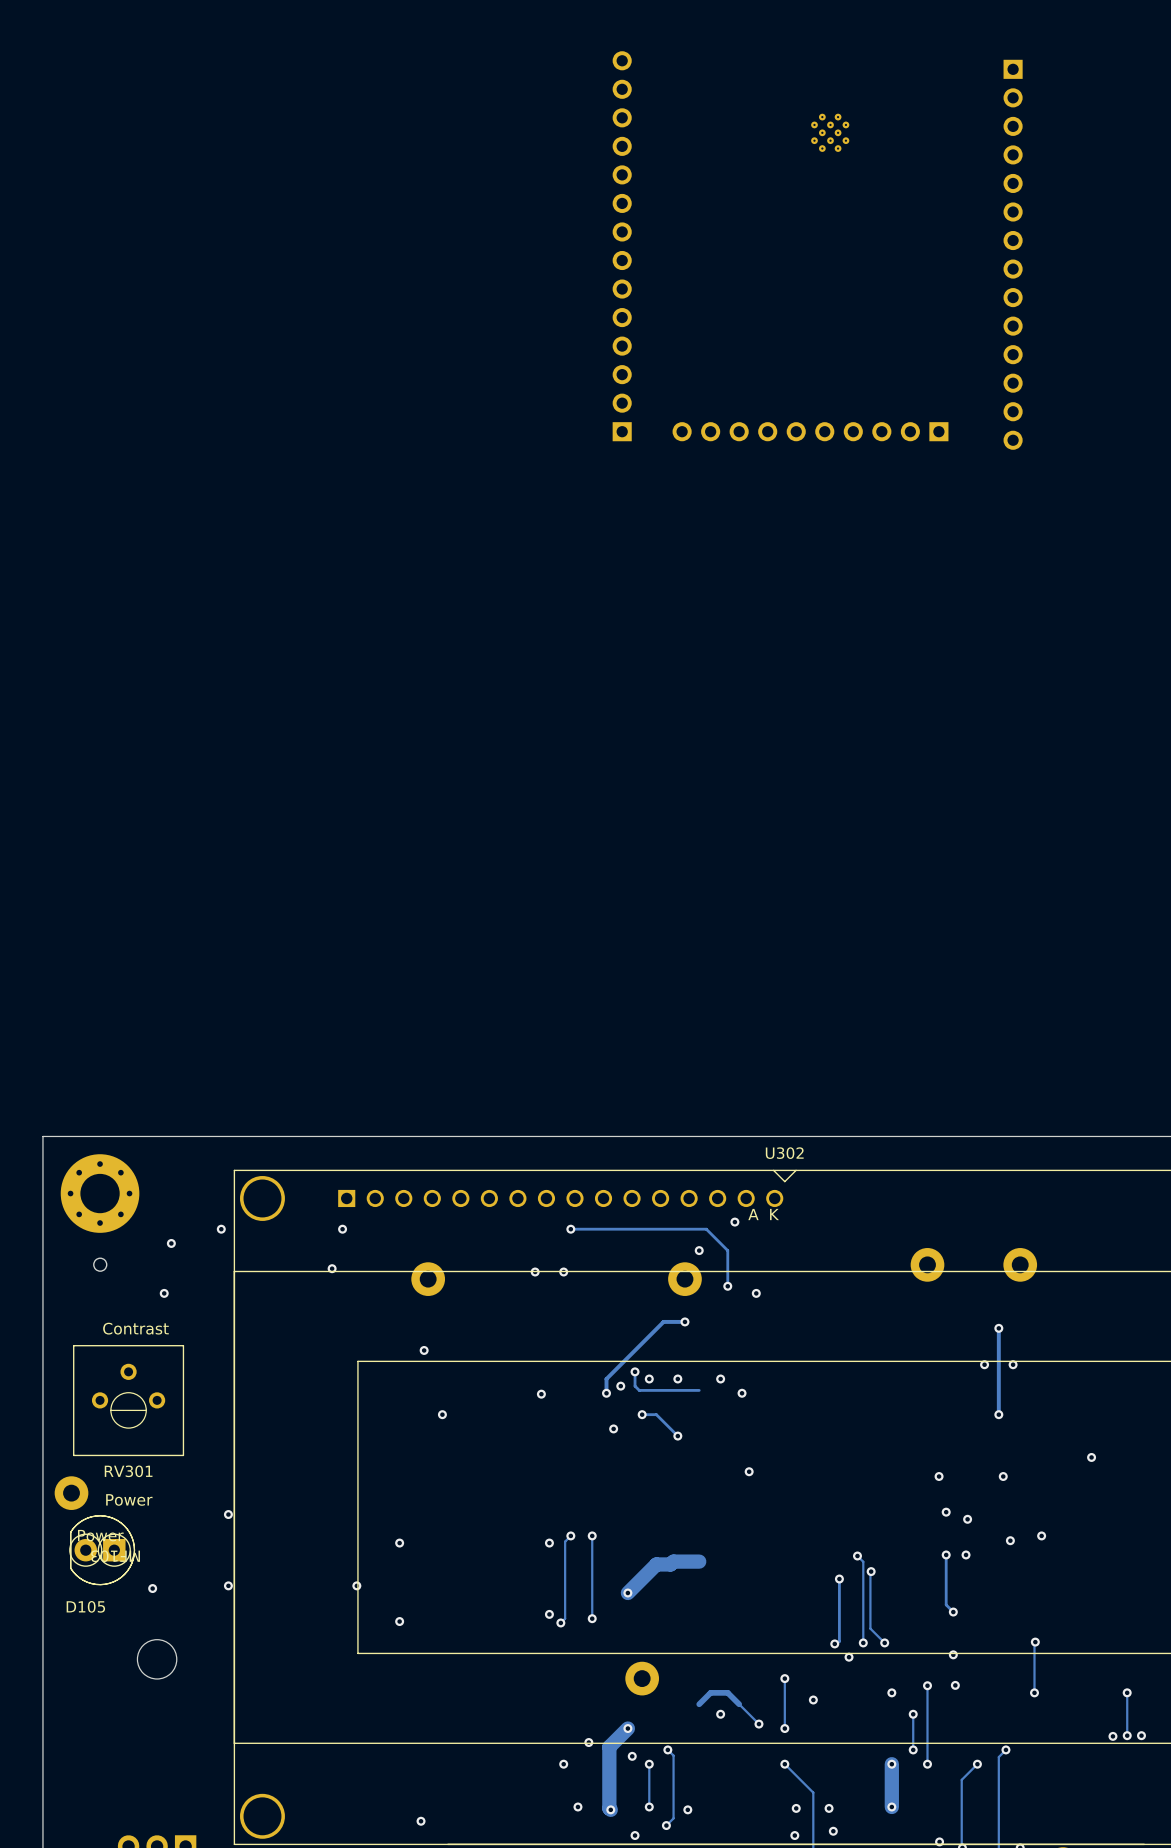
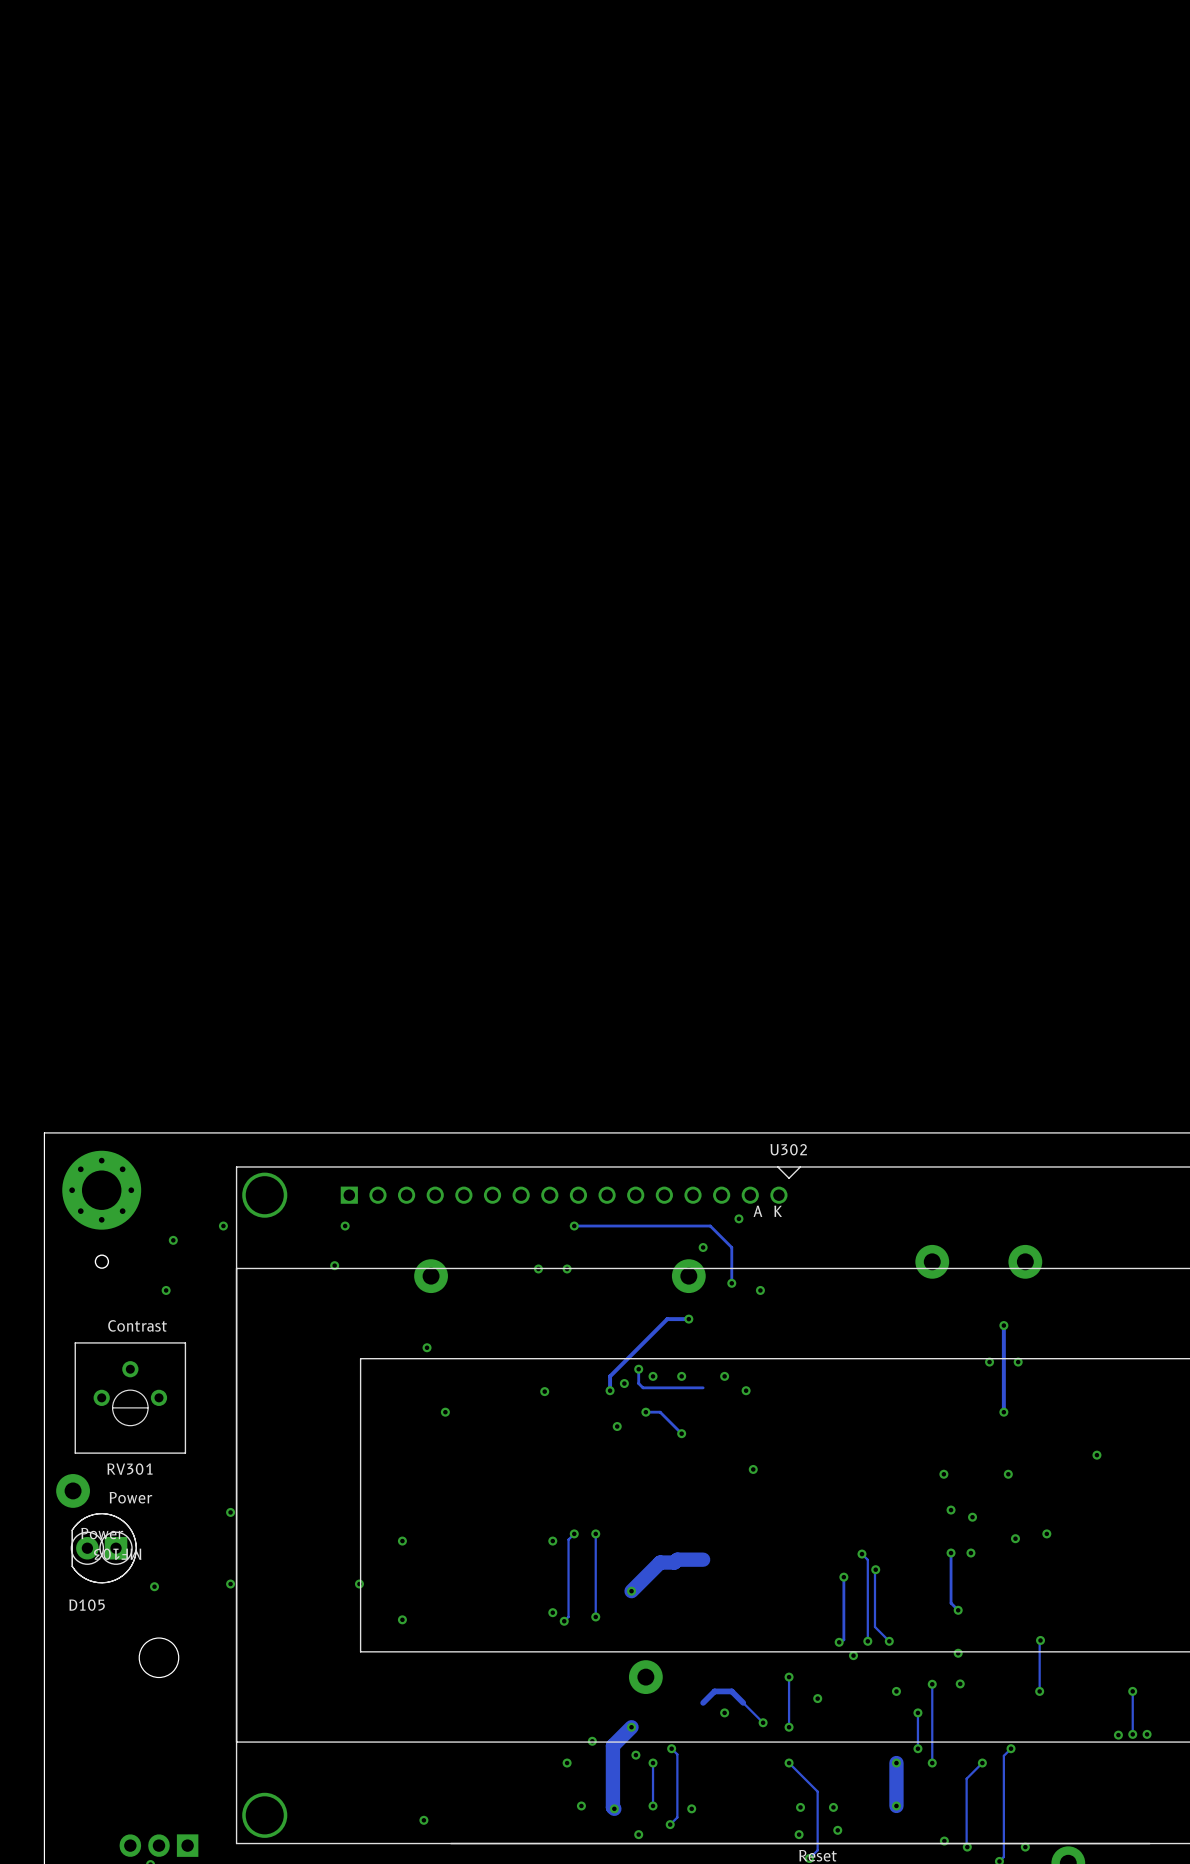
part: (830, 132) -> none
part: (622, 246) -> none
part: (1013, 254) -> none
part: (810, 431) -> none

